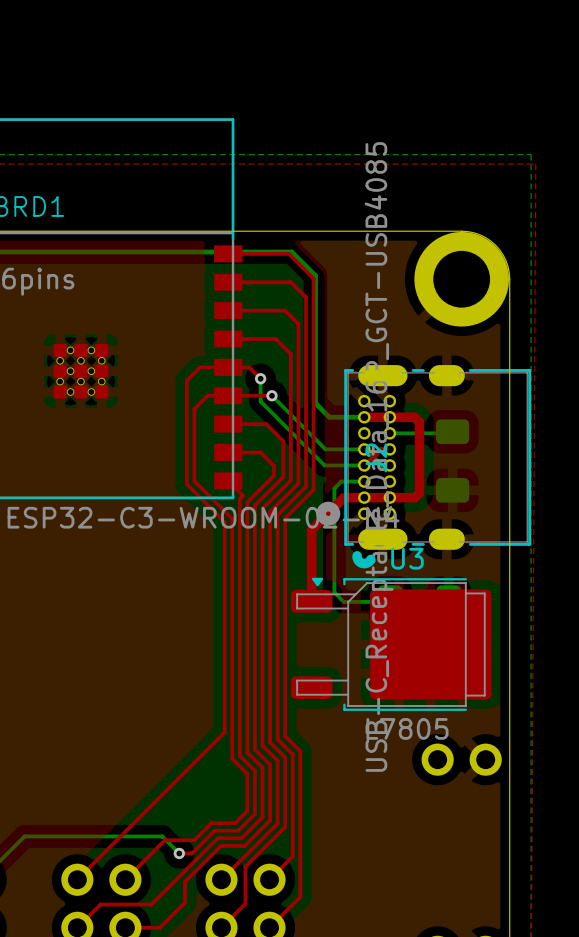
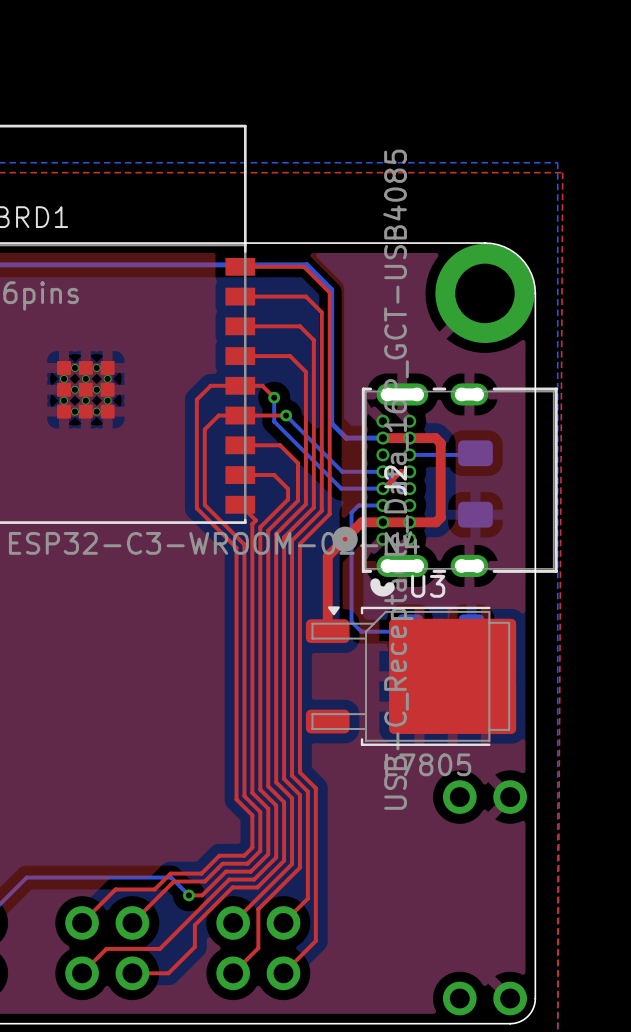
top track: (224, 732) (109, 847) -> (236, 768) (236, 799) (252, 815) (252, 847) (244, 855) (219, 855) (201, 873) (170, 873) (154, 889) (115, 889)

